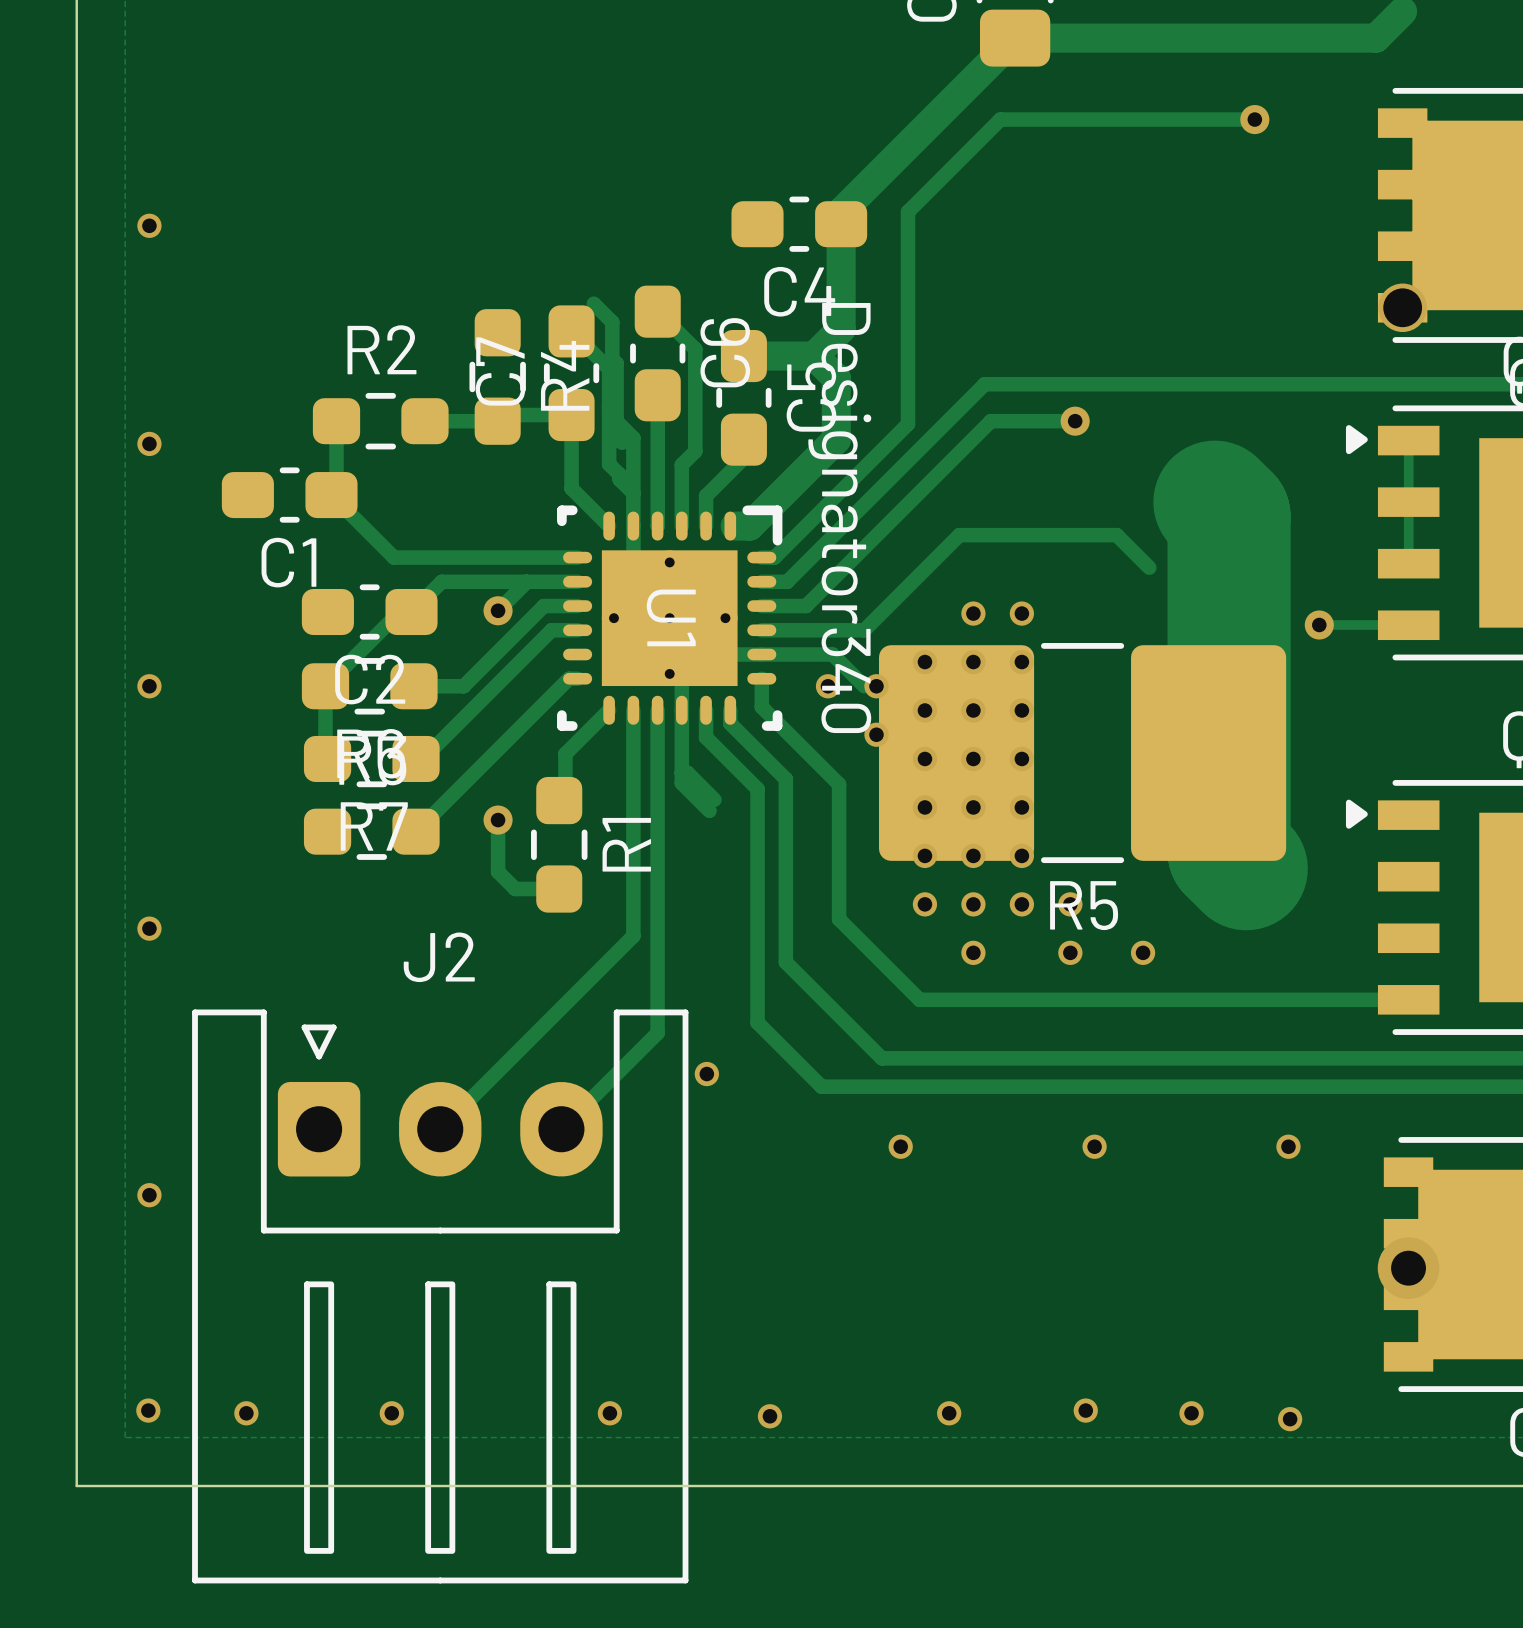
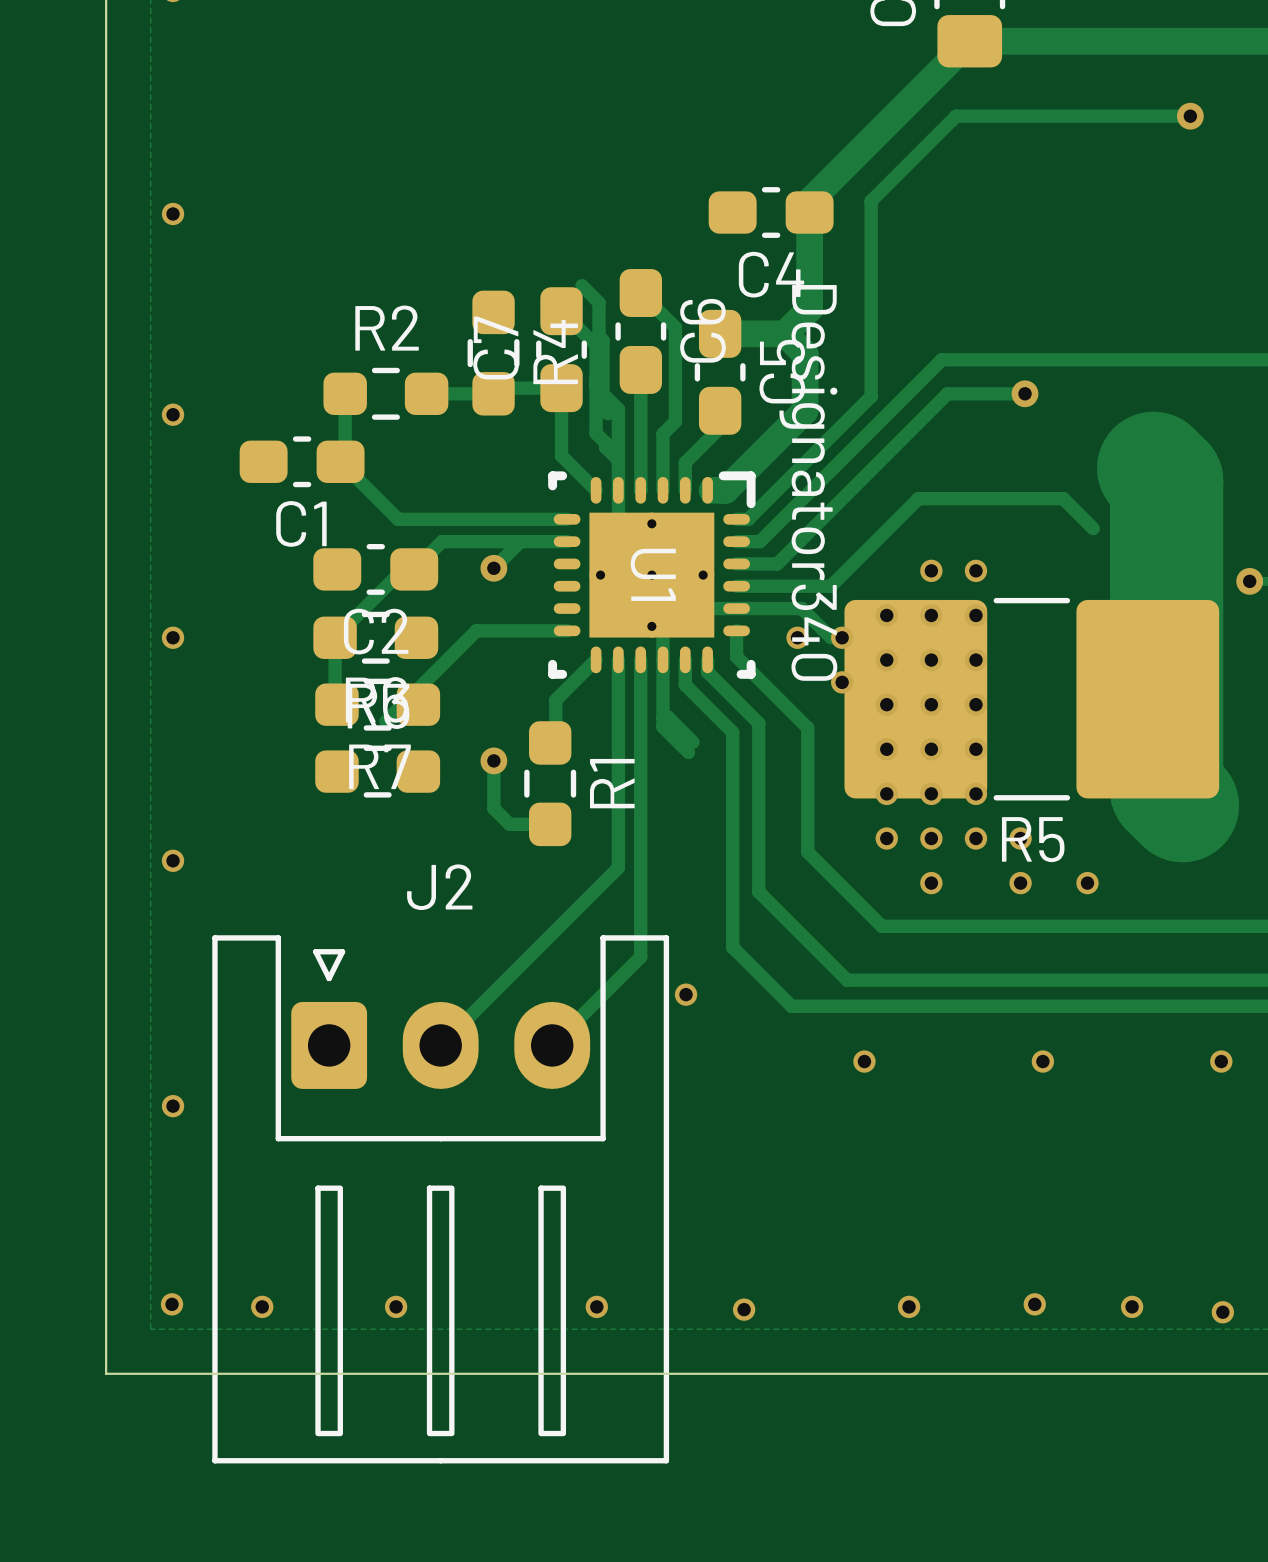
track: (577, 606) (543, 606) (463, 686) (413, 686) -> none
track: (577, 630) (551, 630) (422, 758) (416, 758) -> none
track: (568, 678) (416, 831) -> (559, 630) (476, 630) (385, 721)

